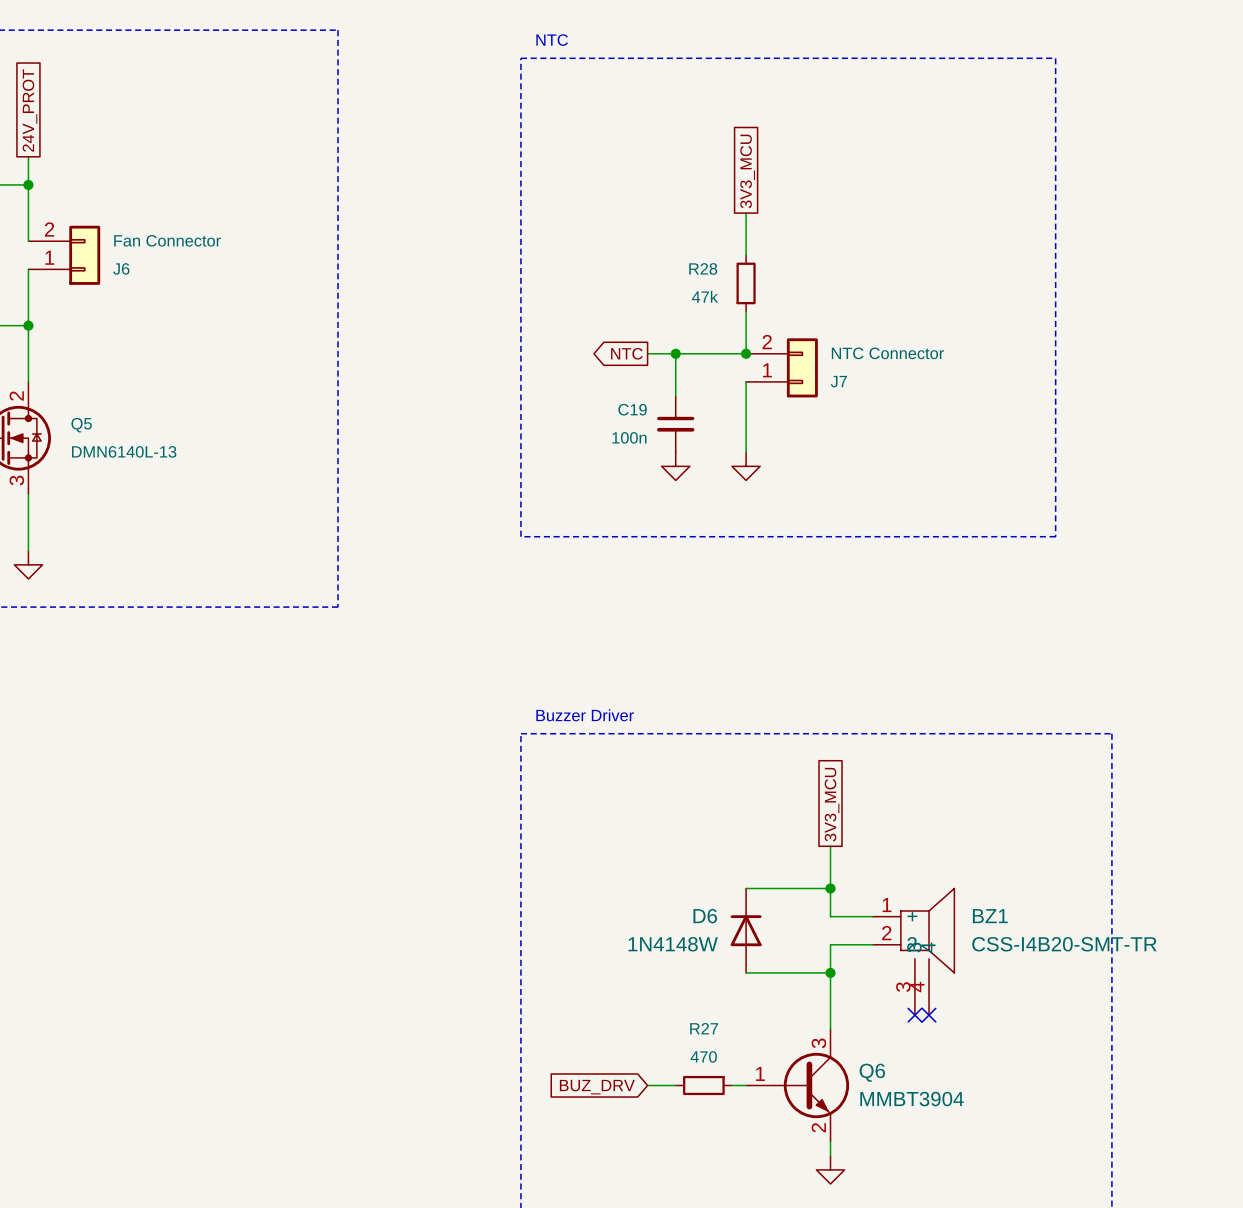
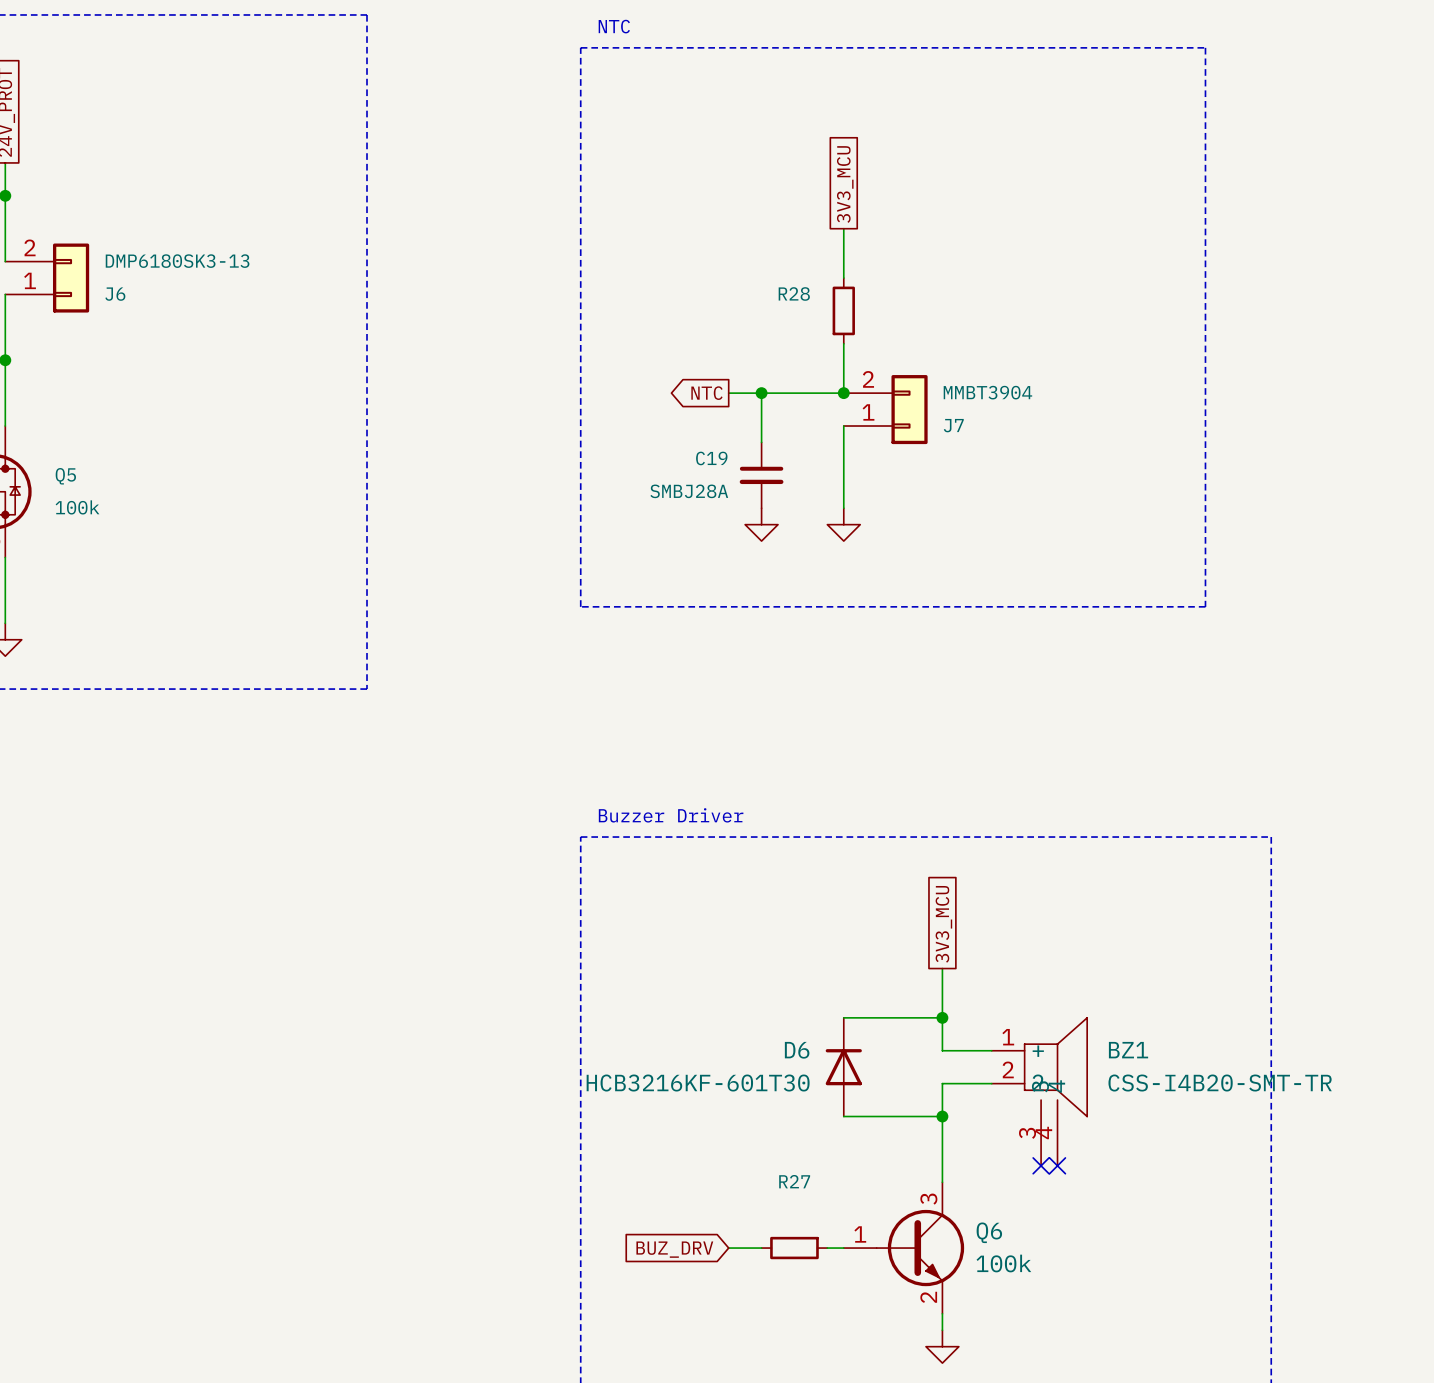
J6 value: Fan Connector (167, 240) -> DMP6180SK3-13 (177, 261)
R28 value: 47k (704, 296) -> none
J7 value: NTC Connector (887, 353) -> MMBT3904 (987, 392)
C19 value: 100n (629, 437) -> SMBJ28A (689, 491)
Q5 value: DMN6140L-13 (124, 451) -> 100k (77, 507)
D6 value: 1N4148W (673, 944) -> HCB3216KF-601T30 (698, 1083)
R27 value: 470 (703, 1056) -> none
Q6 value: MMBT3904 (912, 1099) -> 100k (1003, 1263)

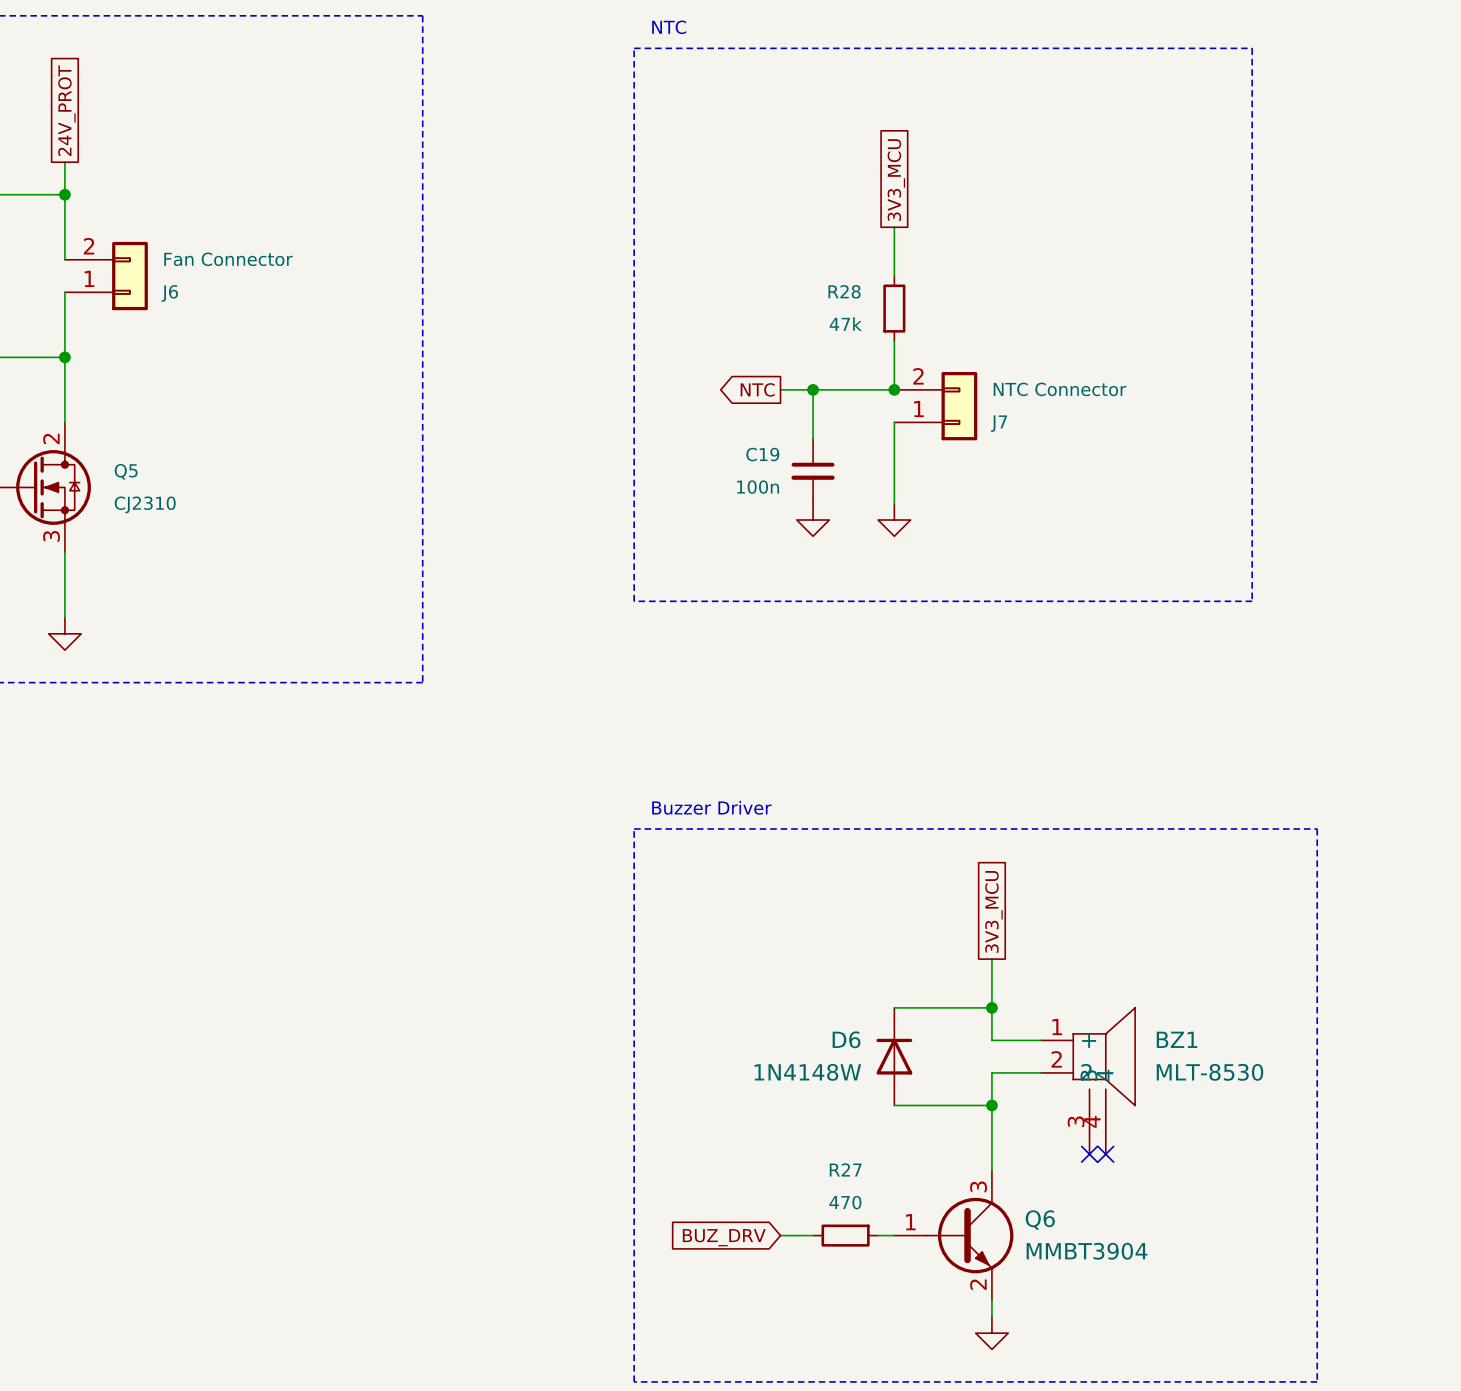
J6 value: DMP6180SK3-13 (177, 261) -> Fan Connector (228, 259)
R28 value: none -> 47k (845, 324)
J7 value: MMBT3904 (987, 392) -> NTC Connector (1060, 389)
C19 value: SMBJ28A (689, 491) -> 100n (758, 487)
Q5 value: 100k (77, 507) -> CJ2310 (145, 504)
D6 value: HCB3216KF-601T30 (698, 1083) -> 1N4148W (807, 1072)
BZ1 value: CSS-I4B20-SMT-TR (1220, 1083) -> MLT-8530 (1209, 1072)
R27 value: none -> 470 (845, 1202)
Q6 value: 100k (1003, 1263) -> MMBT3904 (1087, 1251)

